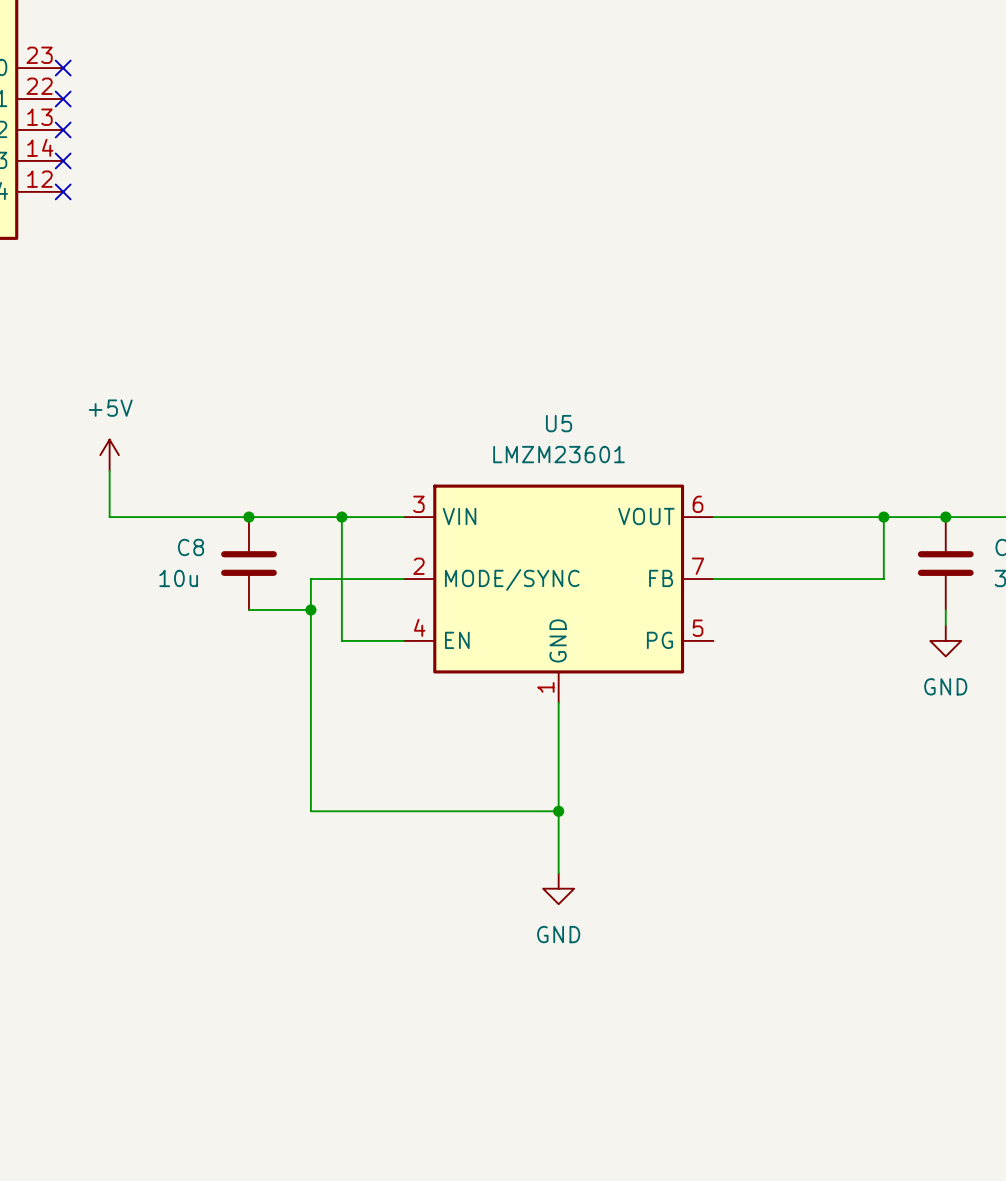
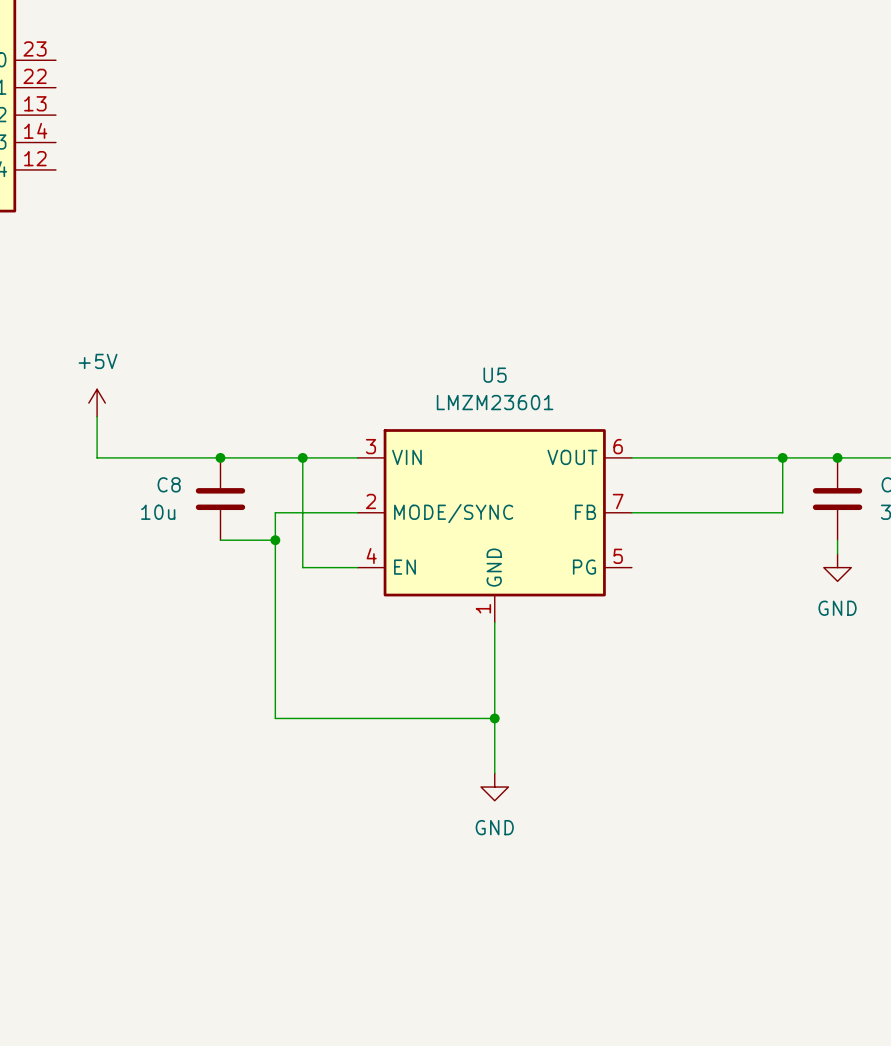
no-connect mark: (63, 68) -> none
no-connect mark: (63, 99) -> none
no-connect mark: (63, 129) -> none
no-connect mark: (63, 160) -> none
no-connect mark: (63, 191) -> none

